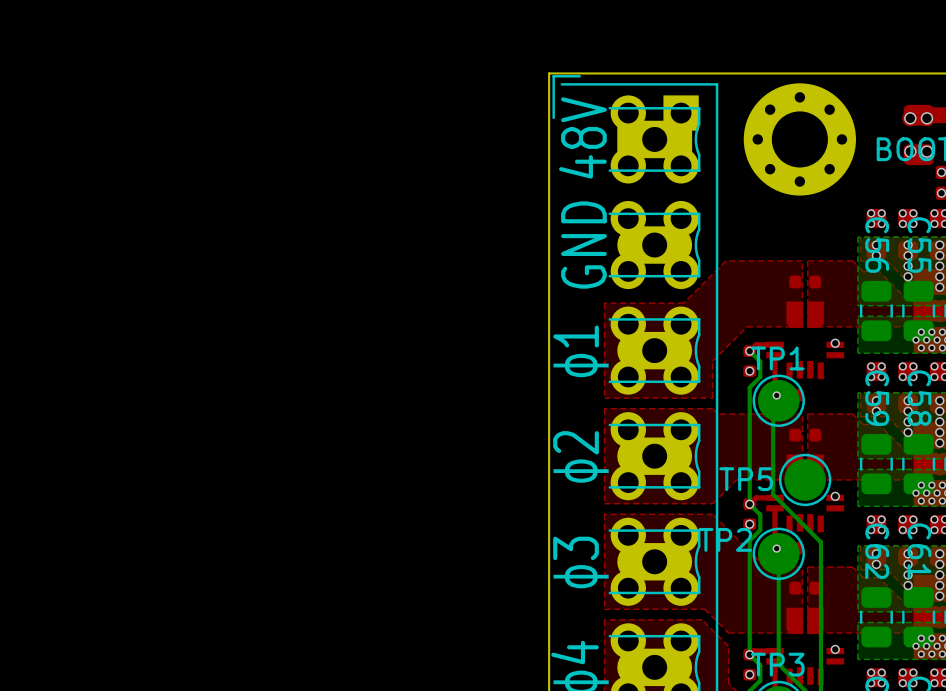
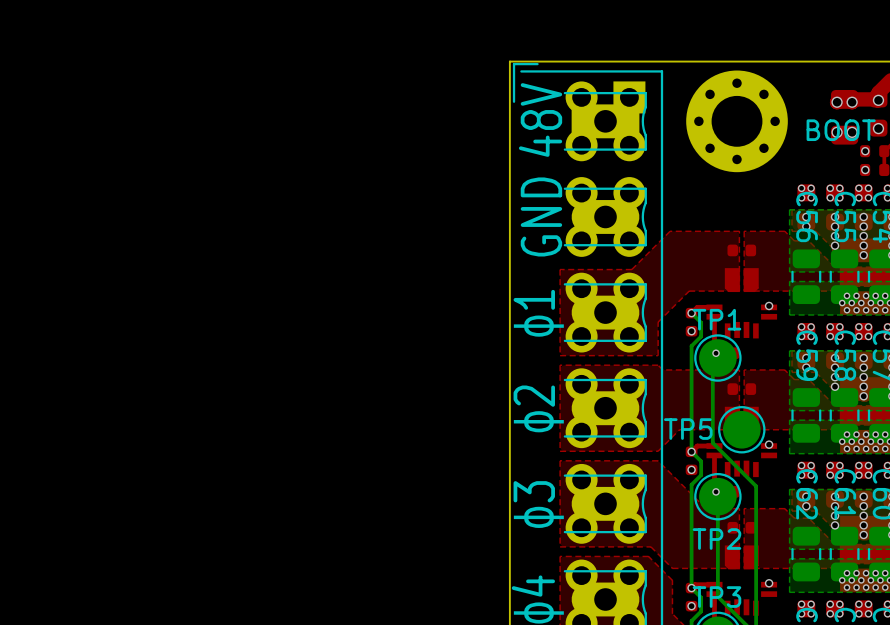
TP2 name position: TP2 (725, 539) -> TP2 (716, 539)

